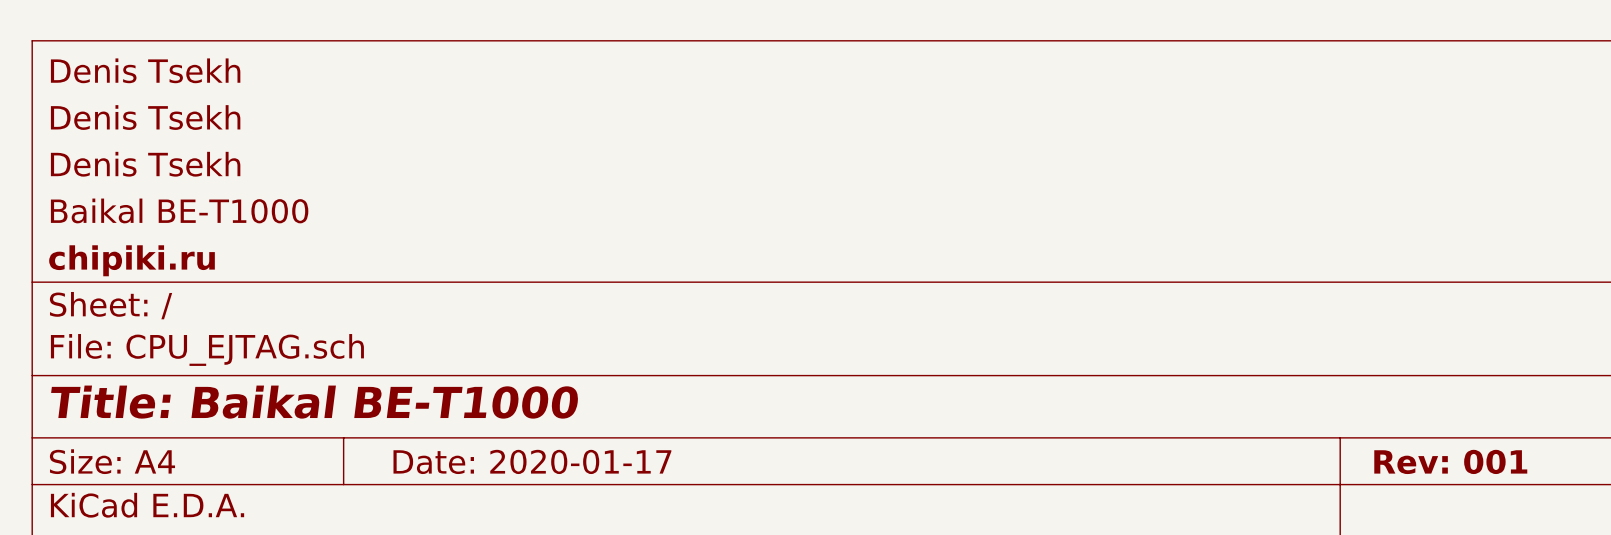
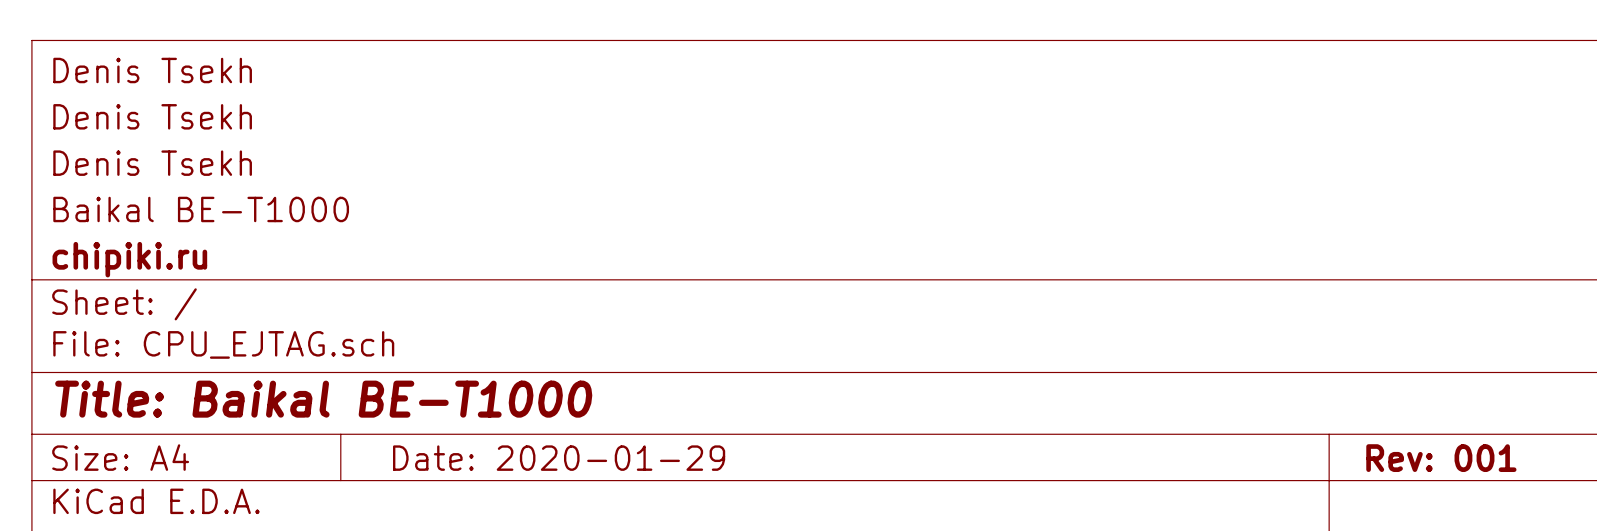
title block: Date: 2020-01-17 (532, 461) -> Date: 2020-01-29 (559, 458)

